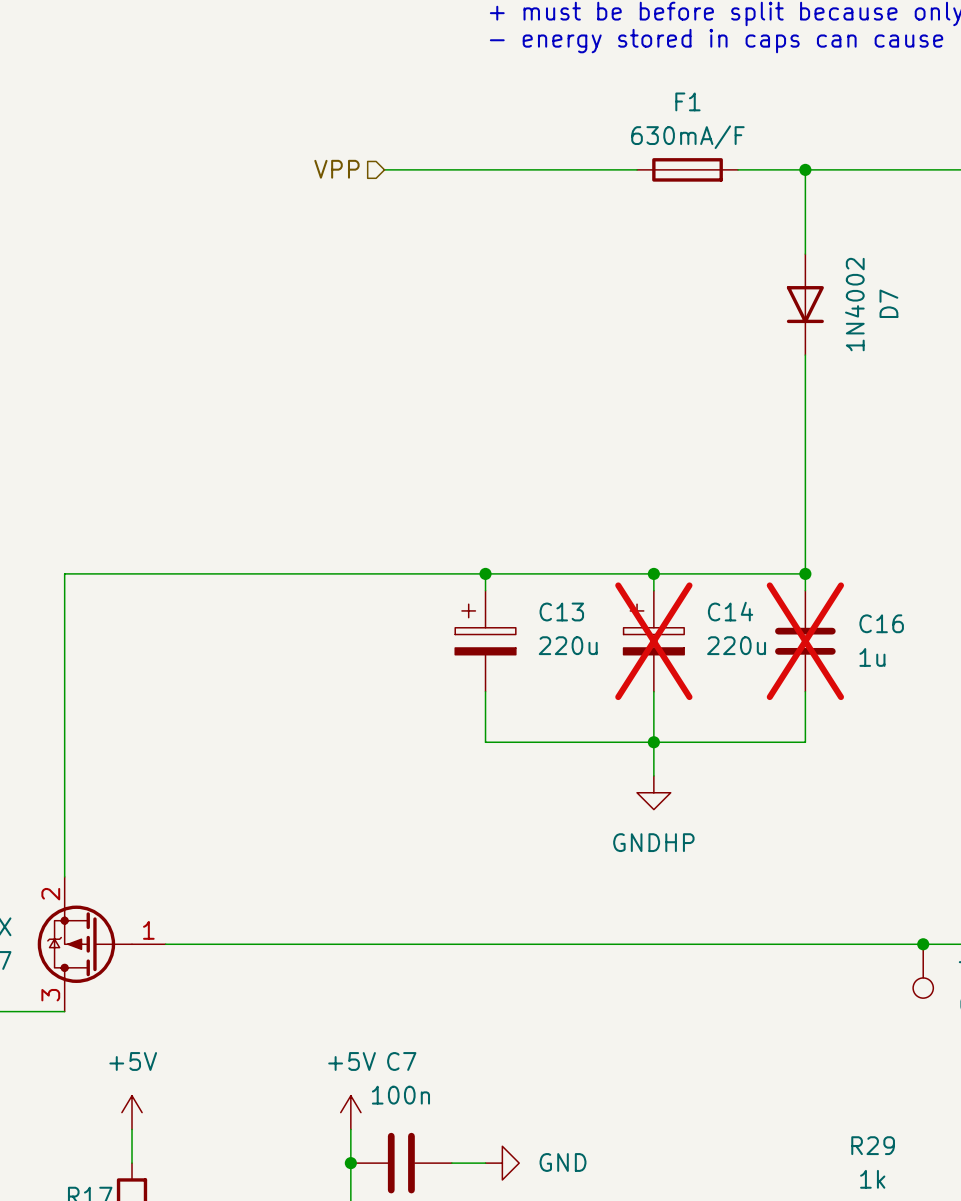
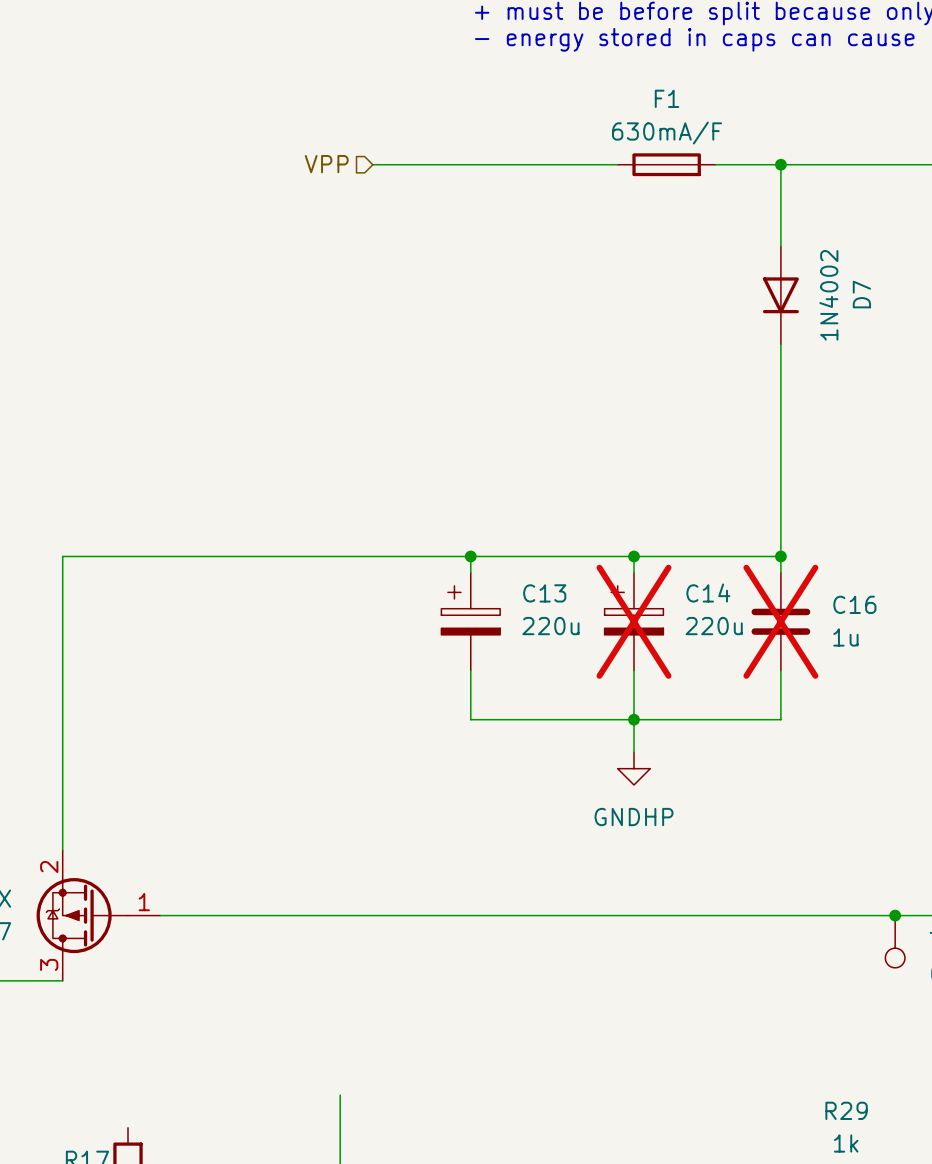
power symbol: +5V (132, 1112) -> none
power symbol: +5V (350, 1112) -> none
wire: (132, 1129) (132, 1163) -> none
junction: (350, 1163) -> none
C7: 100n (401, 1163) -> none
wire: (451, 1163) (485, 1163) -> none
power symbol: GND (502, 1163) -> none

